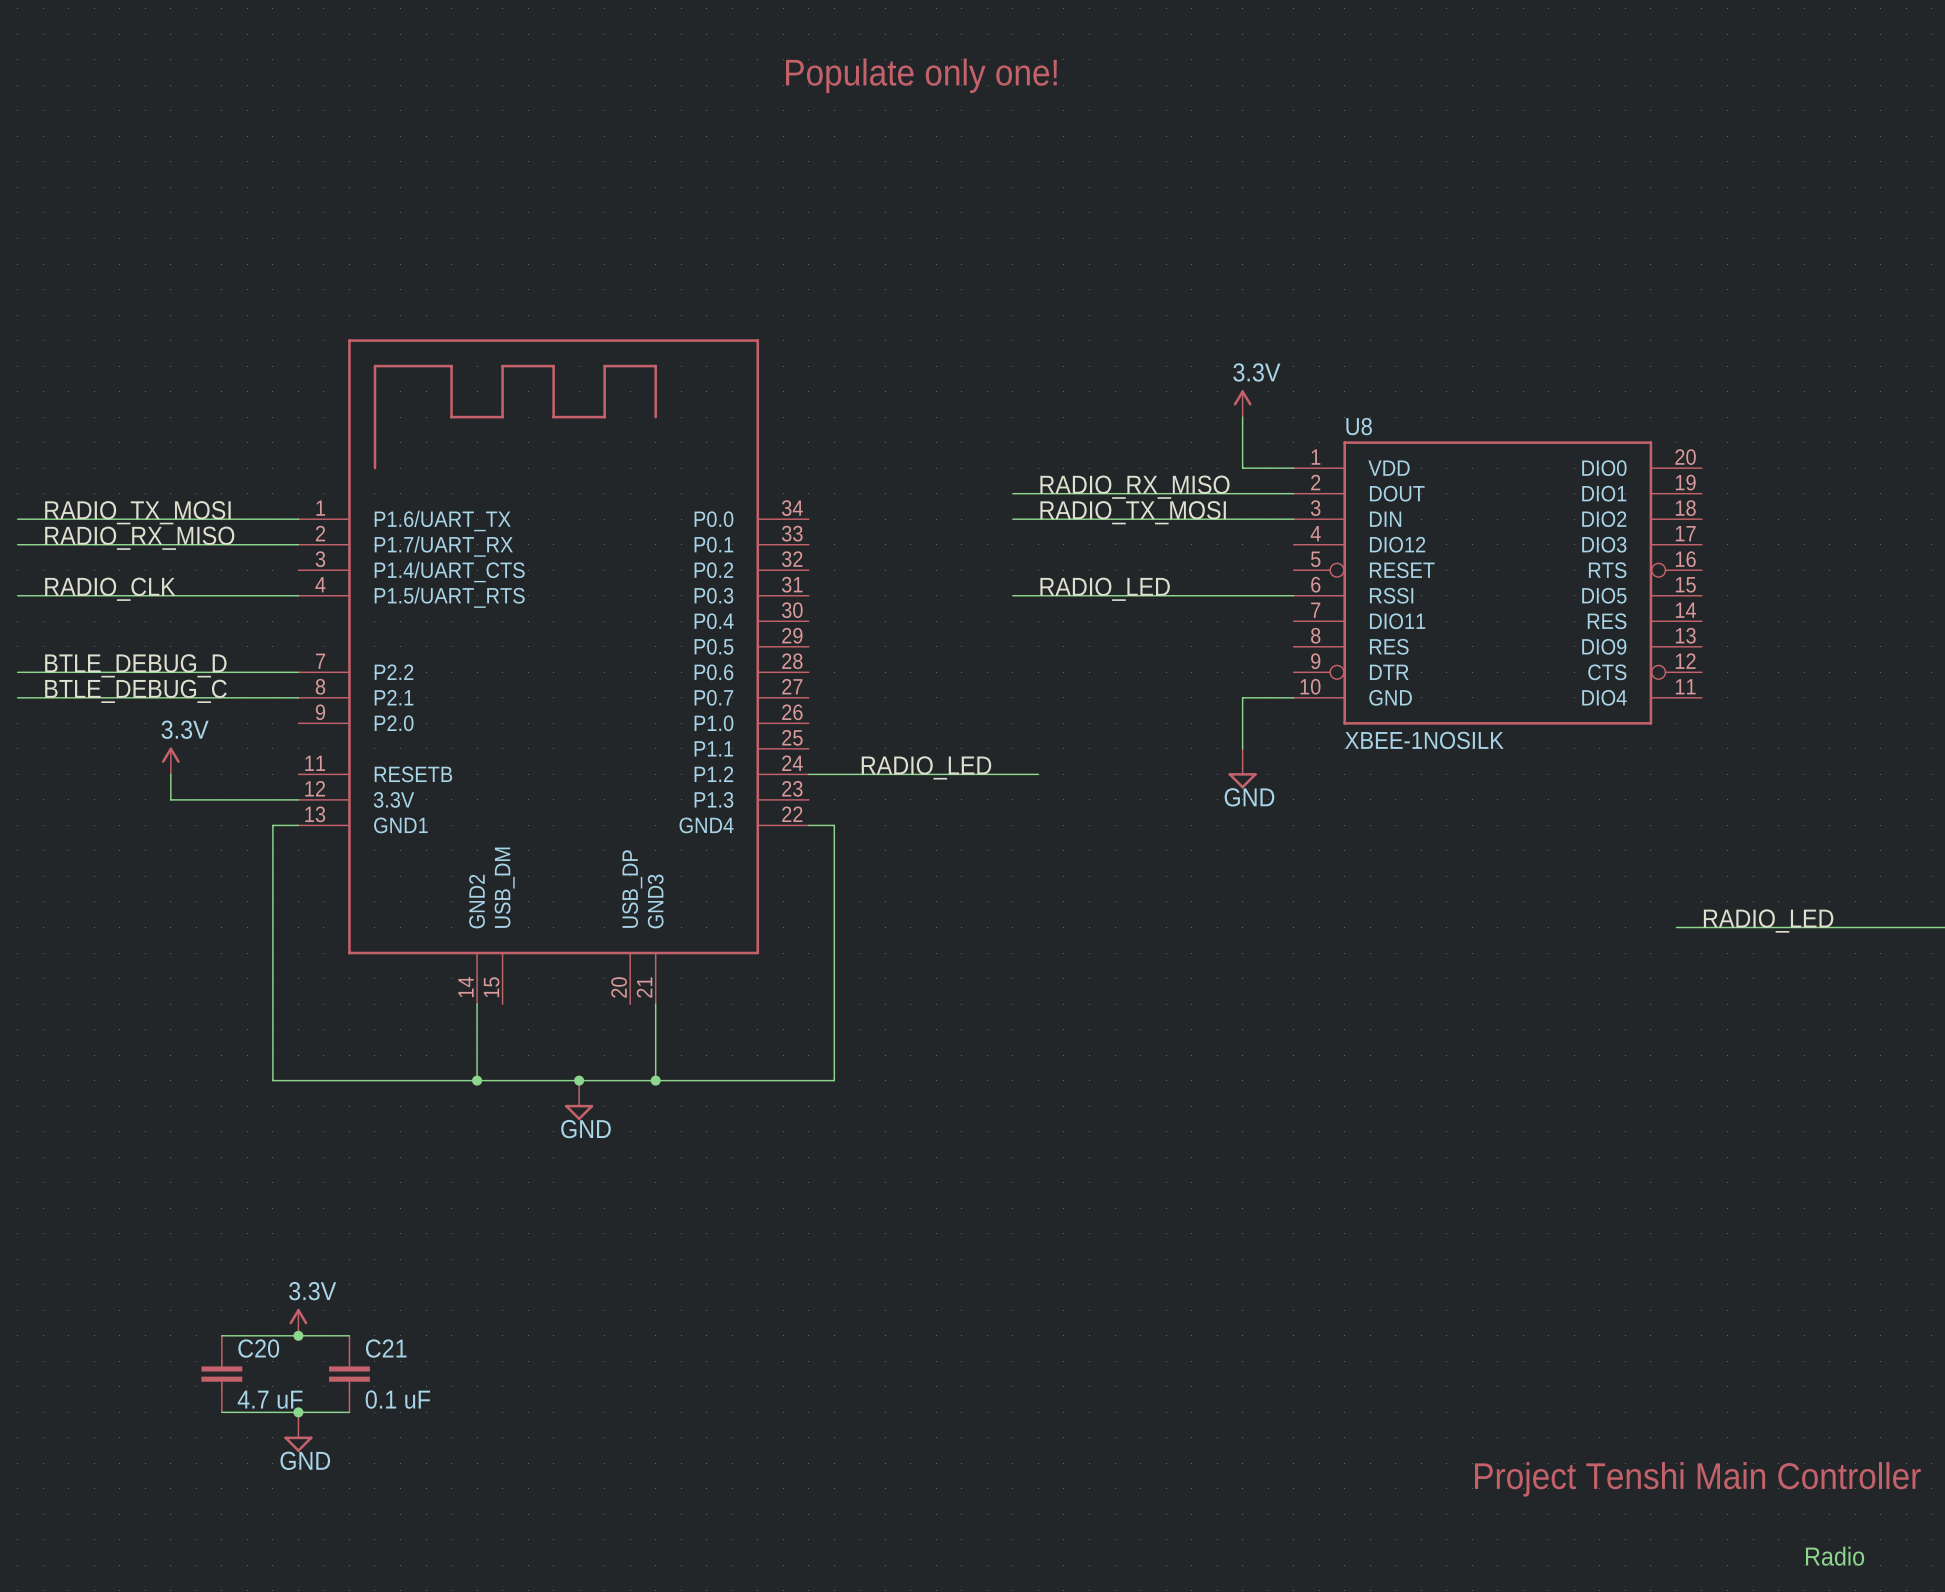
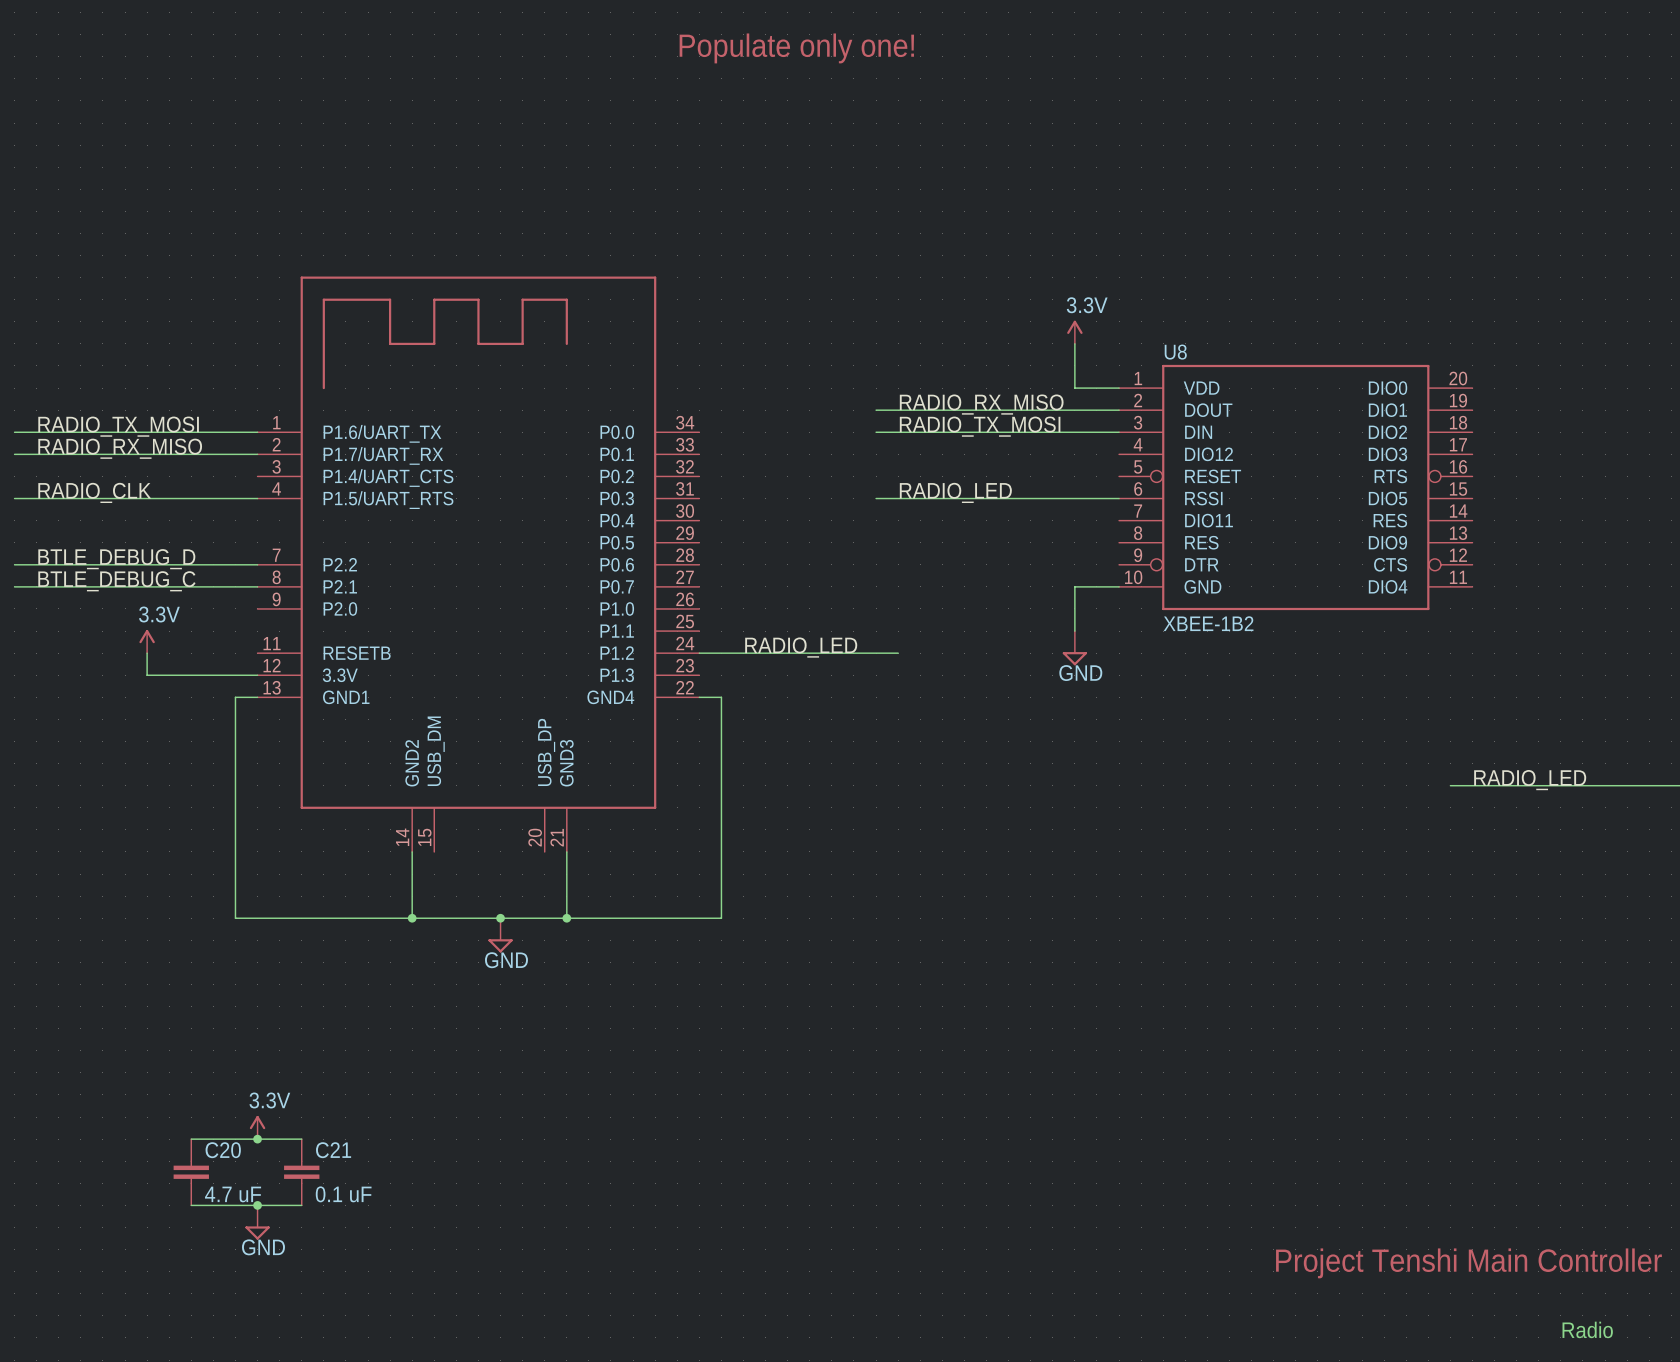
U8 value: XBEE-1NOSILK (1424, 740) -> XBEE-1B2 (1208, 623)

